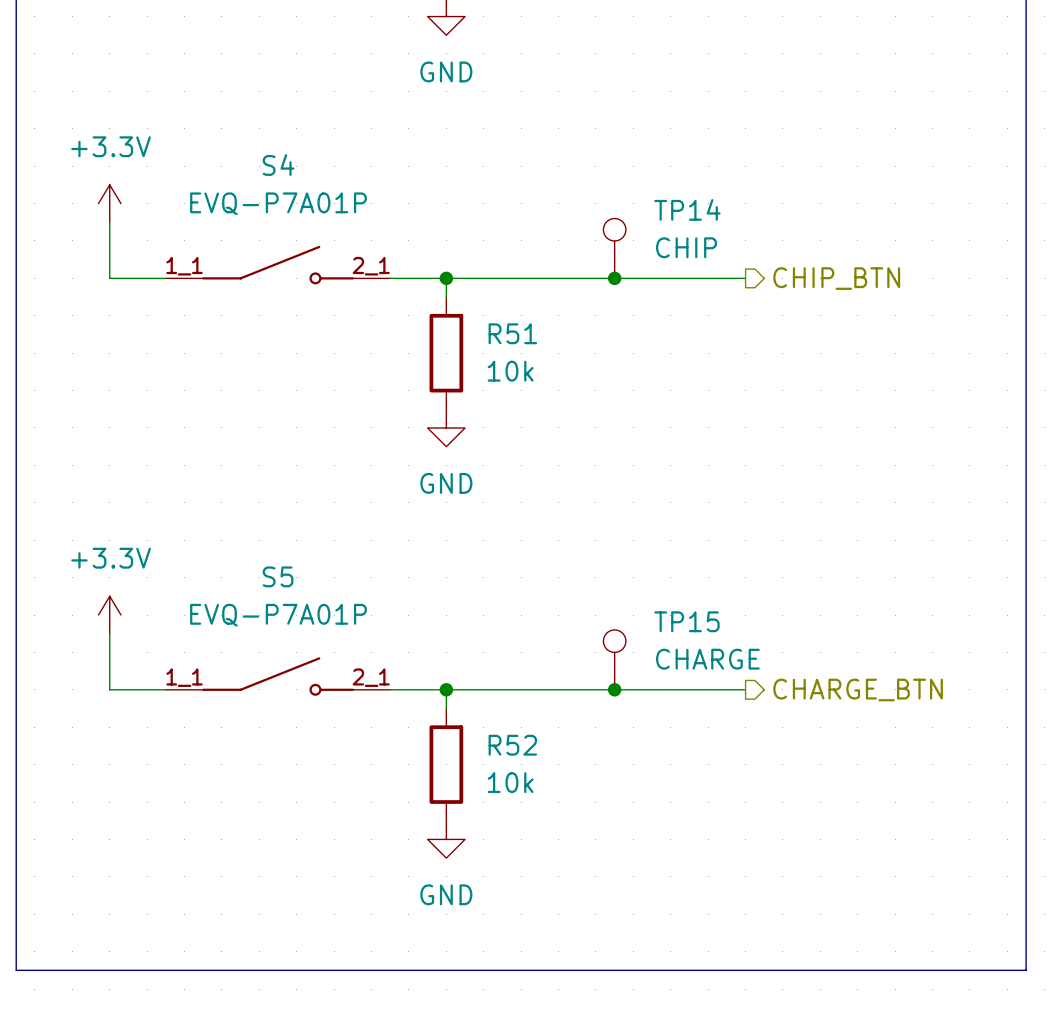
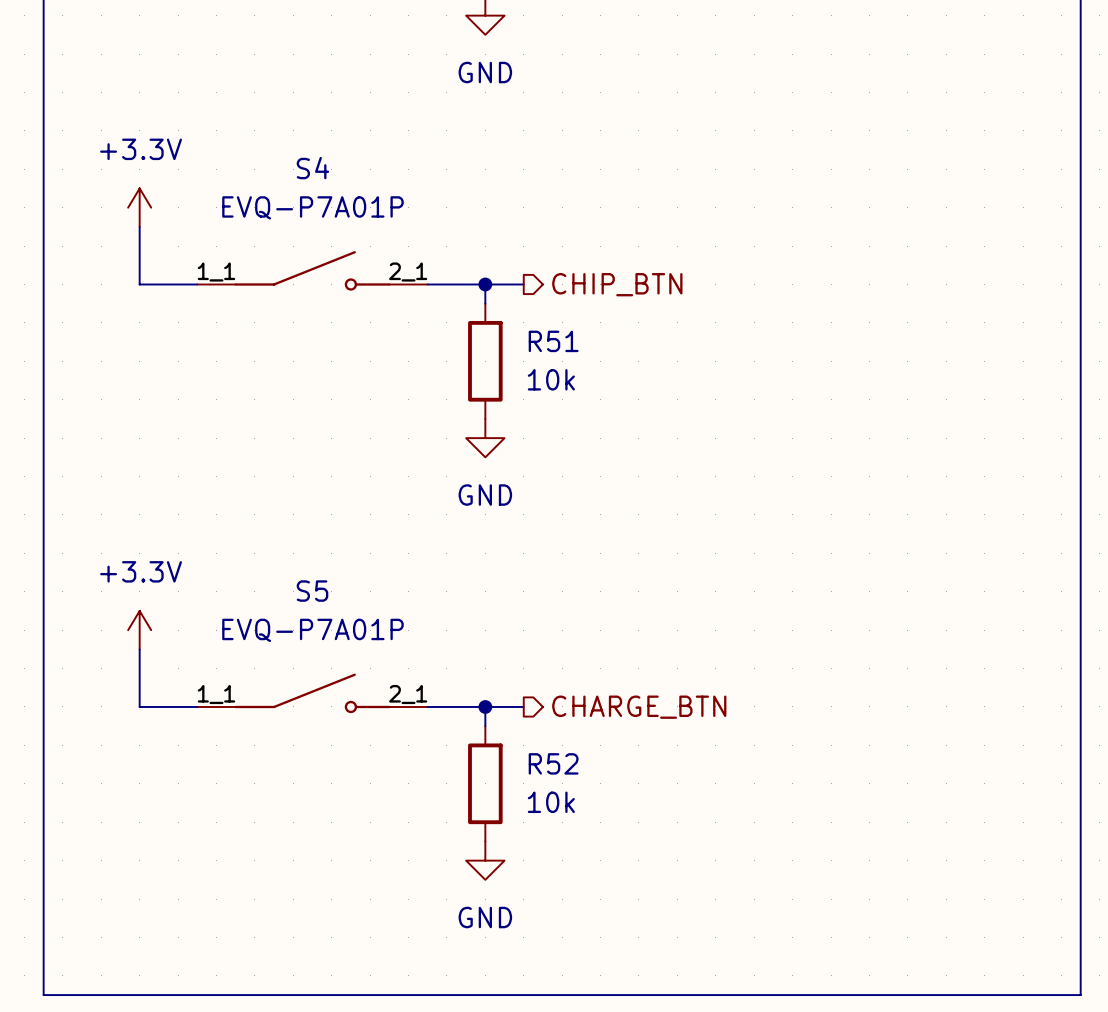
TP14: CHIP (614, 248) -> none
wire: (483, 278) (745, 278) -> none
junction: (614, 278) -> none
hierarchical label position: CHIP_BTN (836, 278) -> CHIP_BTN (617, 284)
TP15: CHARGE (614, 659) -> none
wire: (483, 689) (745, 689) -> none
junction: (614, 689) -> none
hierarchical label position: CHARGE_BTN (858, 689) -> CHARGE_BTN (639, 707)

